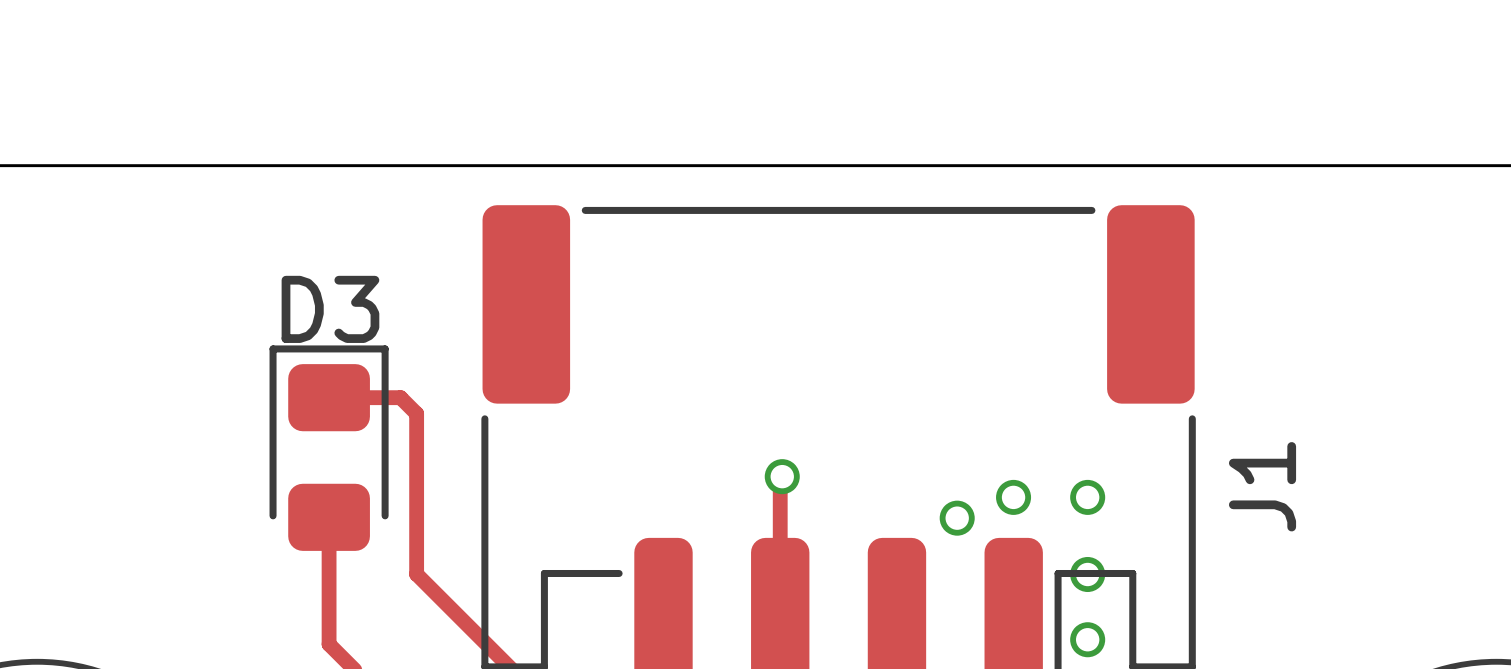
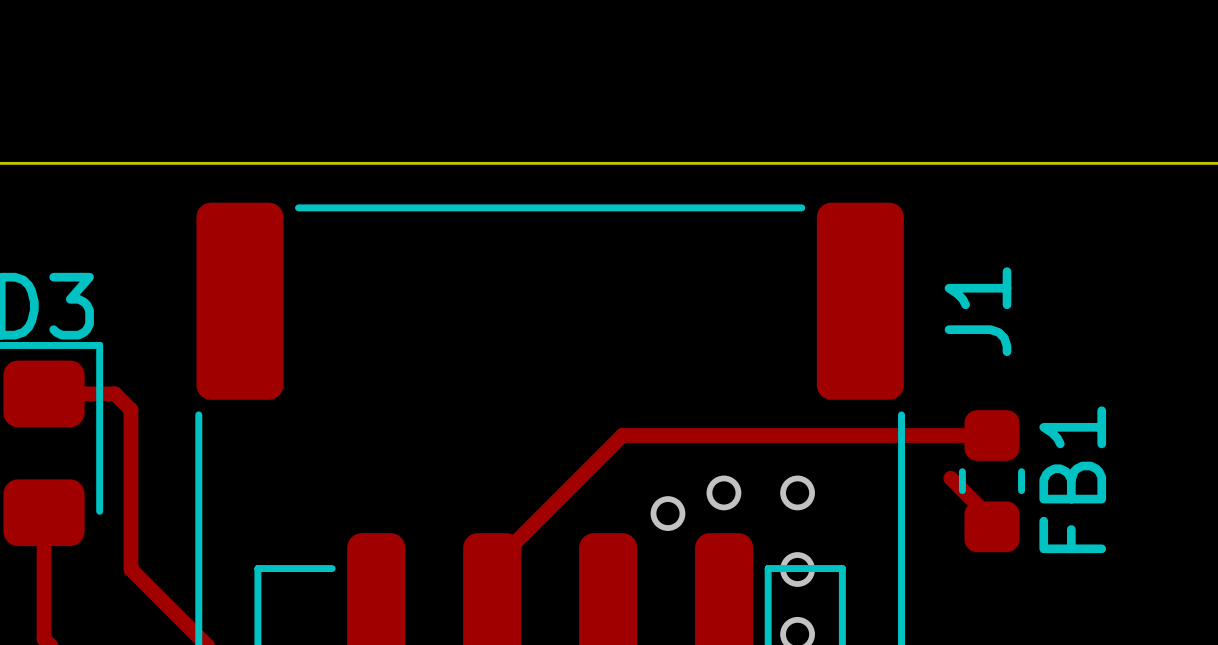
track: (782, 476) (780, 478) (780, 570) -> (991, 435) (622, 435) (492, 565)
via: (782, 476) -> none
track: none -> (950, 478) (991, 519) (991, 526)
FB1: none -> (991, 481)
J1 name position: J1 (1262, 486) -> J1 (978, 311)

